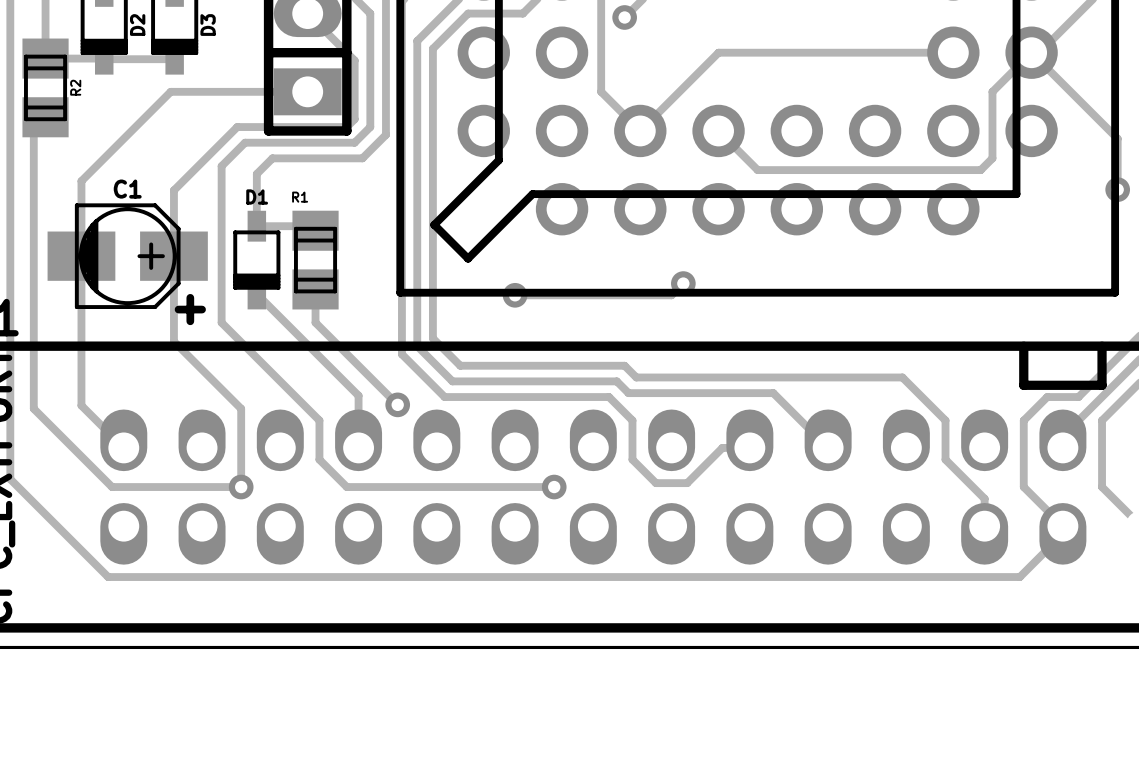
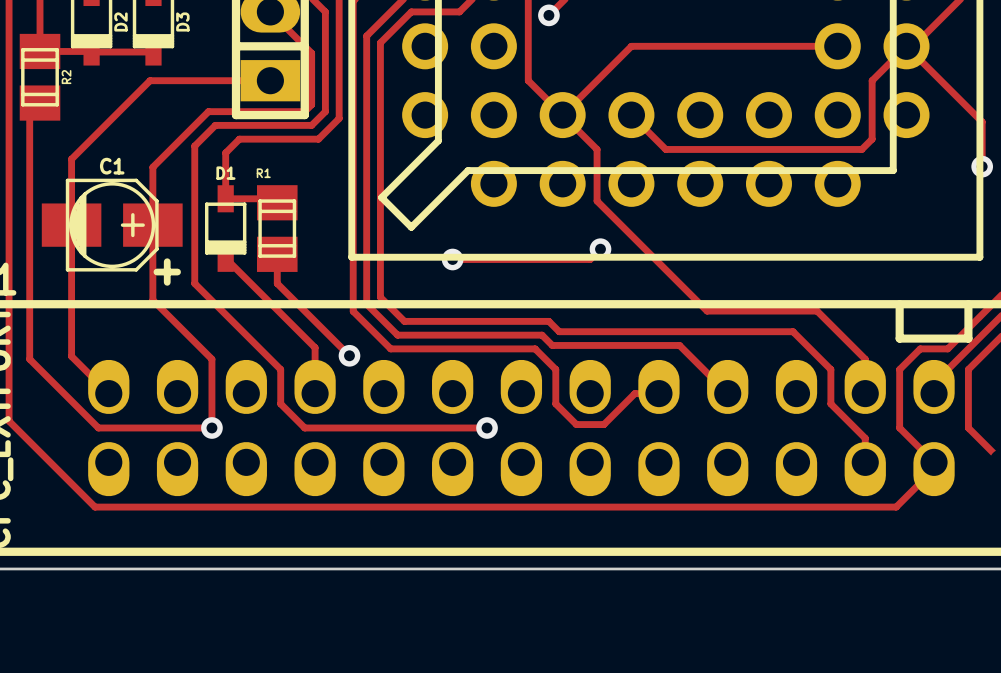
track: none -> (562, 115) (597, 149) (597, 201) (707, 311) (817, 311) (865, 359) (865, 393)

